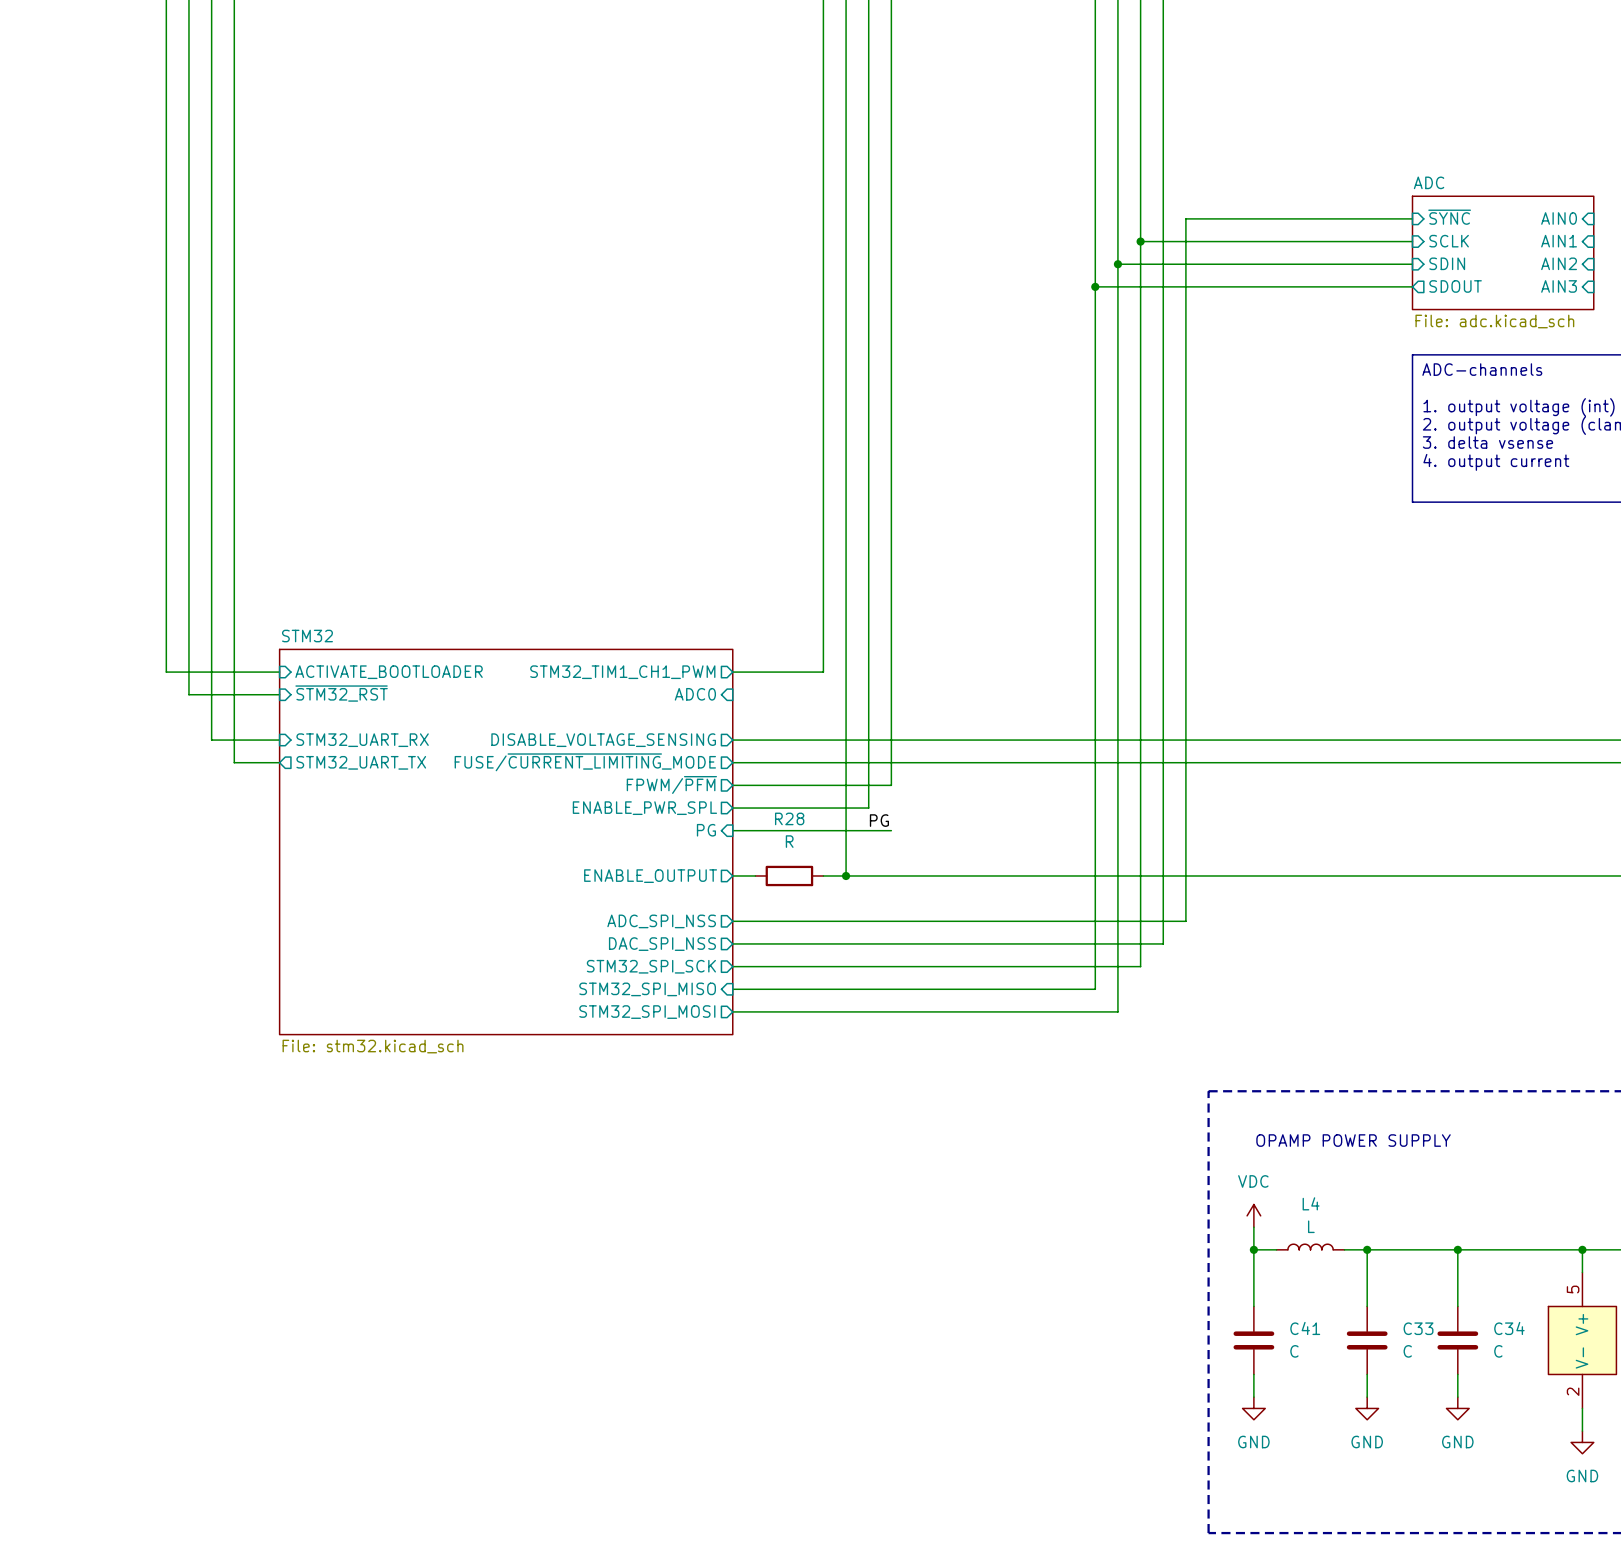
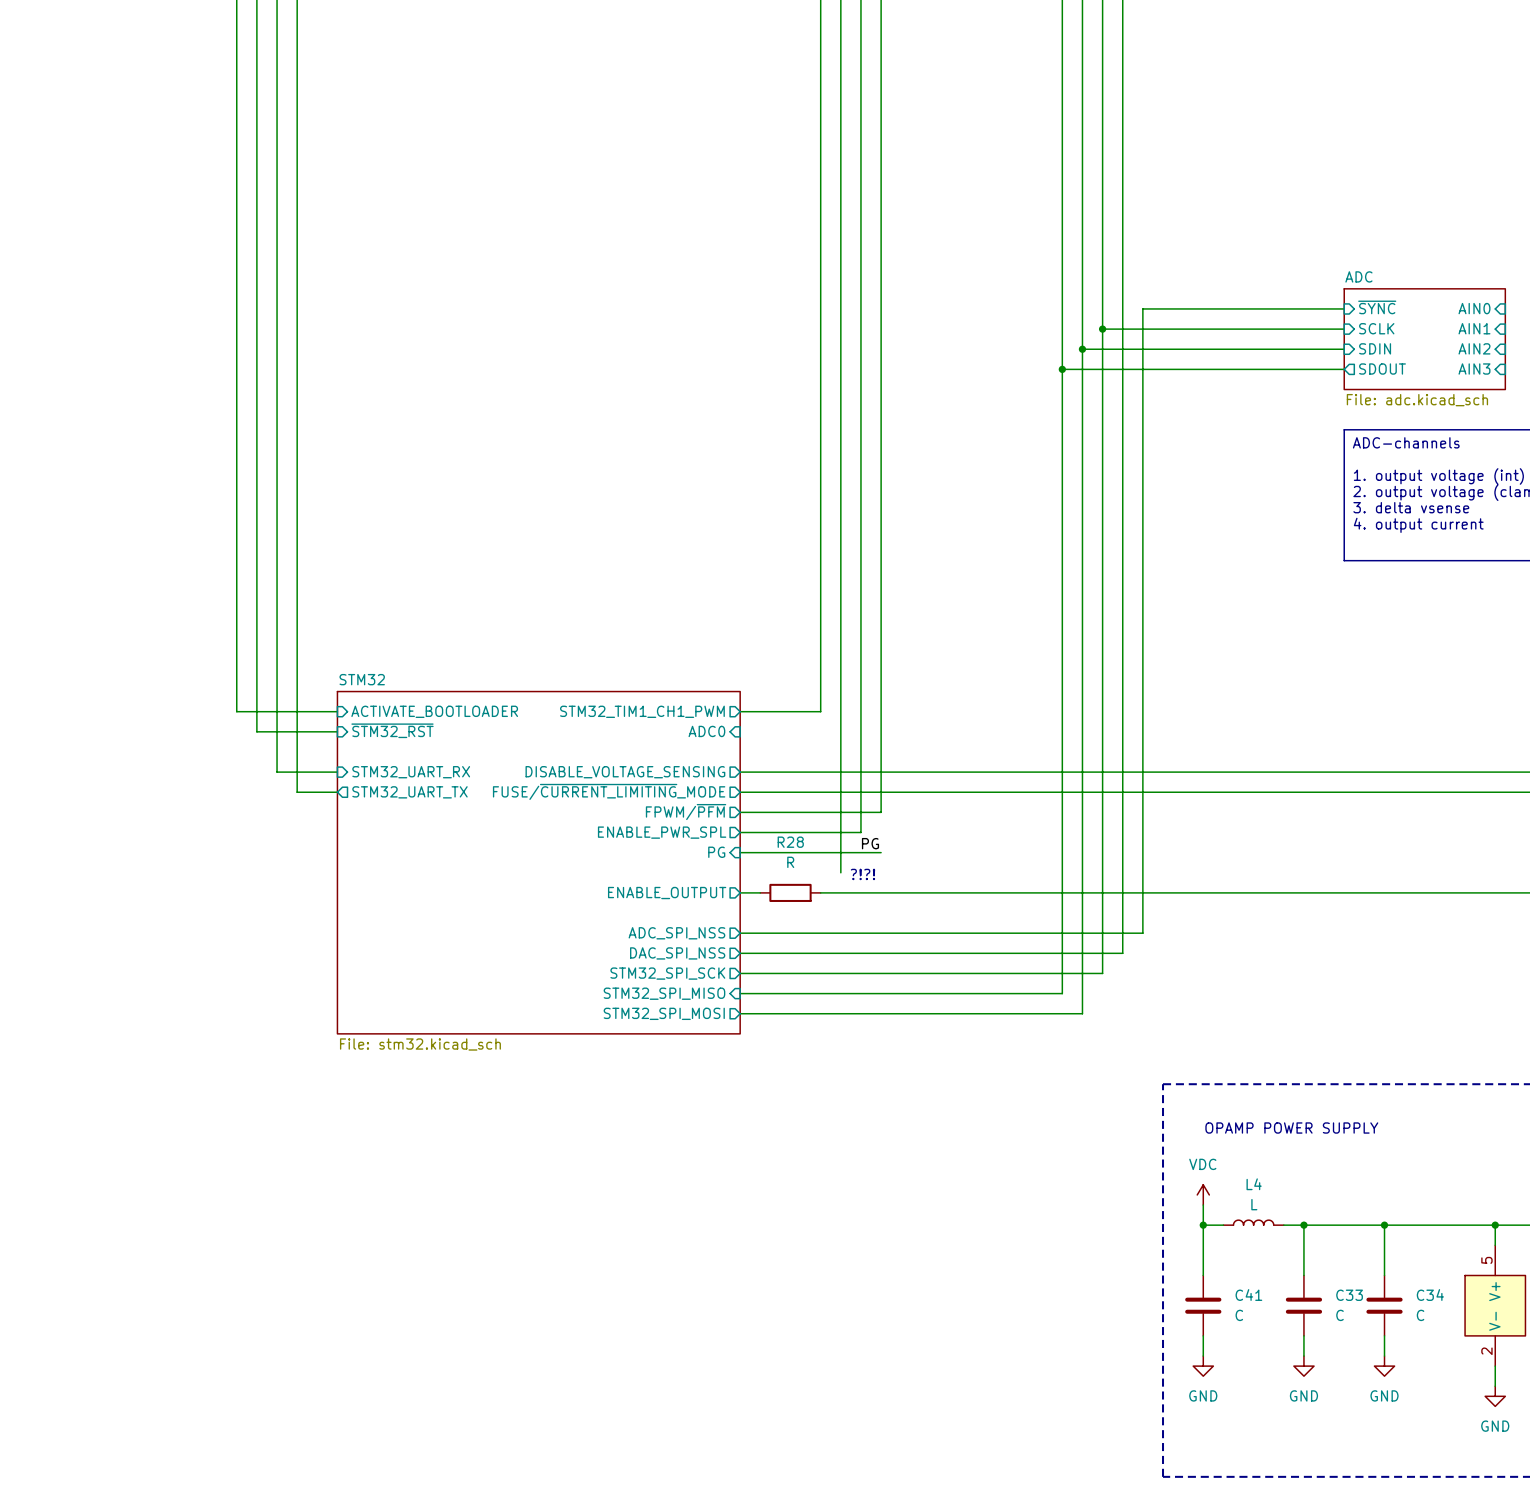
wire: (846, 853) (846, 875) -> none
text: none -> ?!?! (862, 874)
junction: (846, 875) -> none

